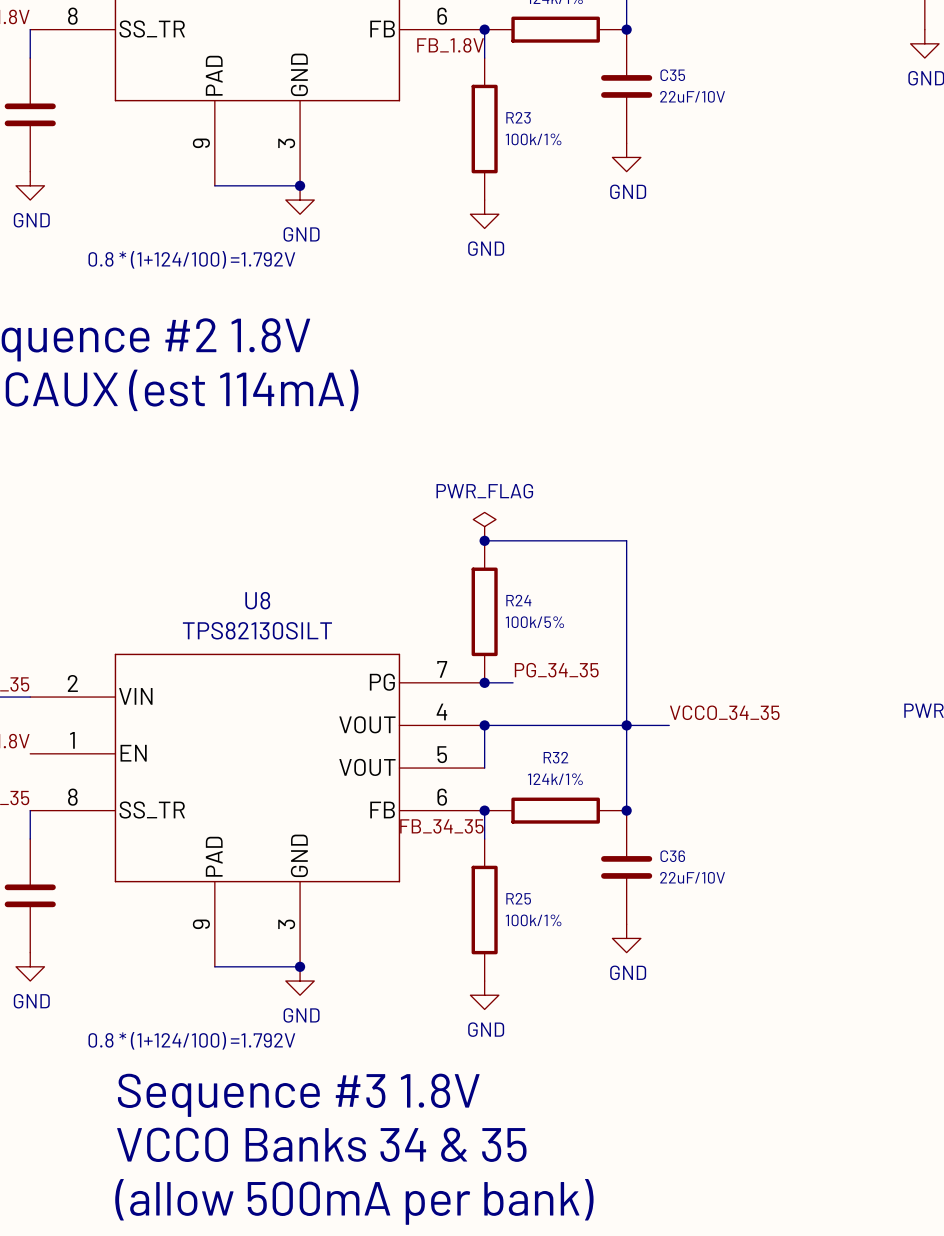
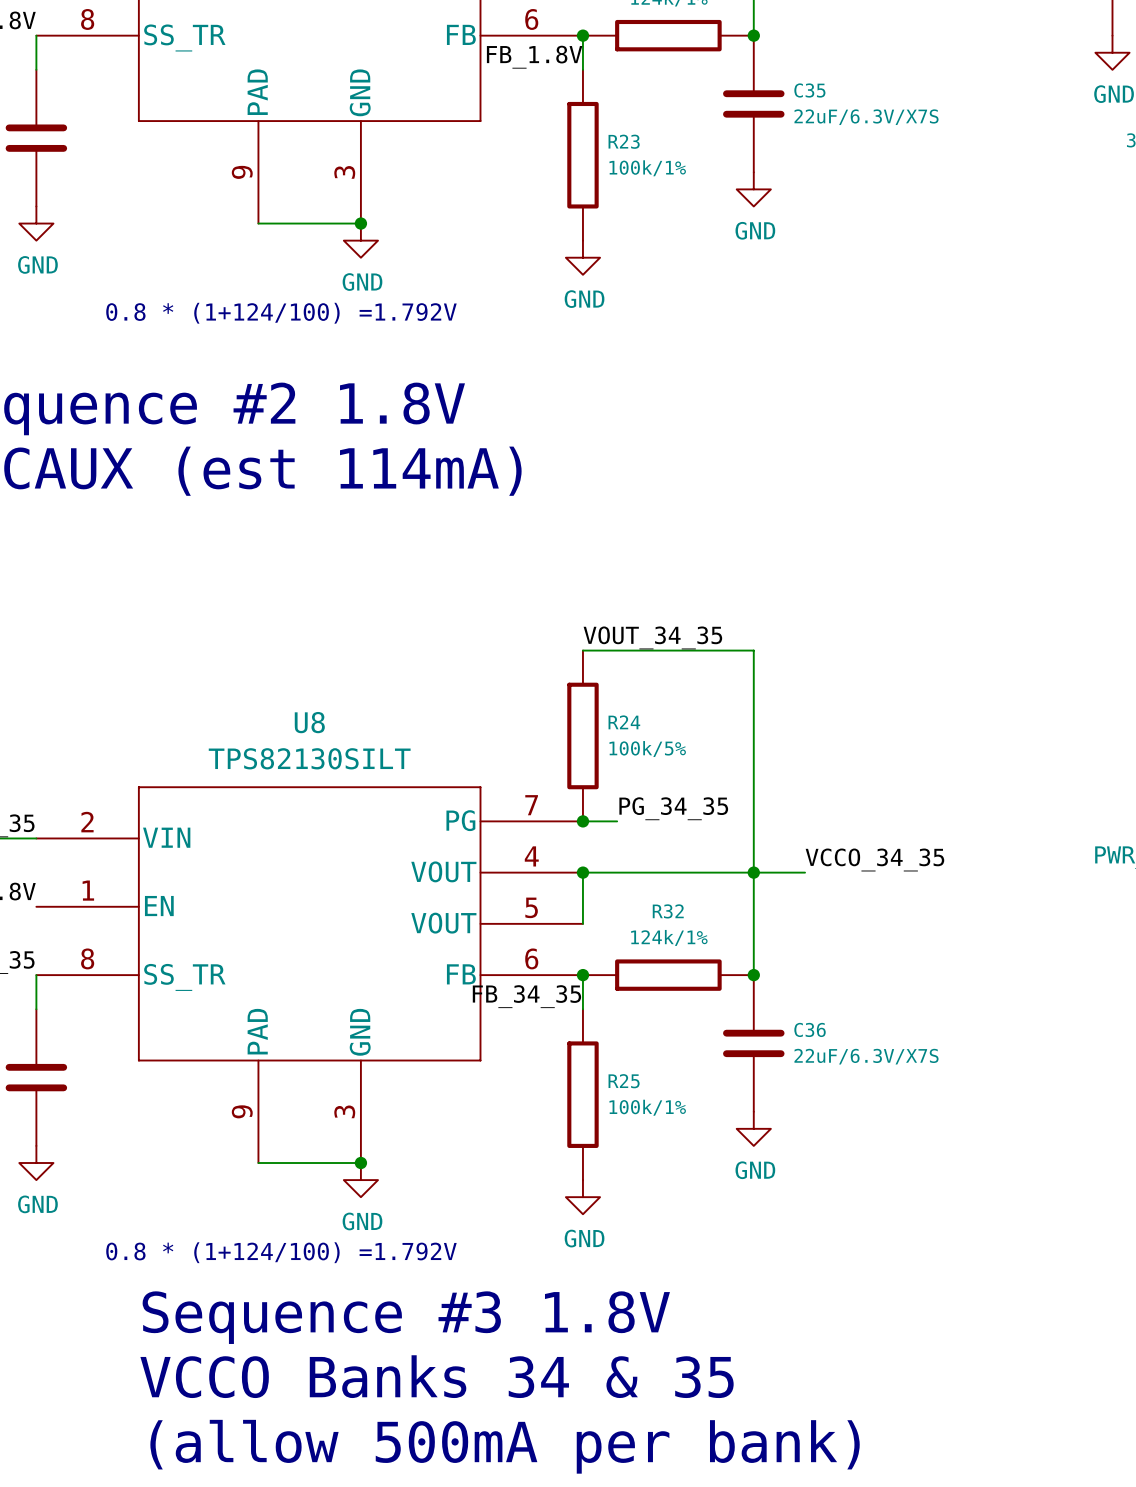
C35 value: 22uF/10V (692, 96) -> 22uF/6.3V/X7S (866, 117)
power symbol: PWR_FLAG (484, 526) -> none
label: none -> VOUT_34_35 (652, 637)
junction: (484, 540) -> none
C36 value: 22uF/10V (692, 877) -> 22uF/6.3V/X7S (866, 1056)

